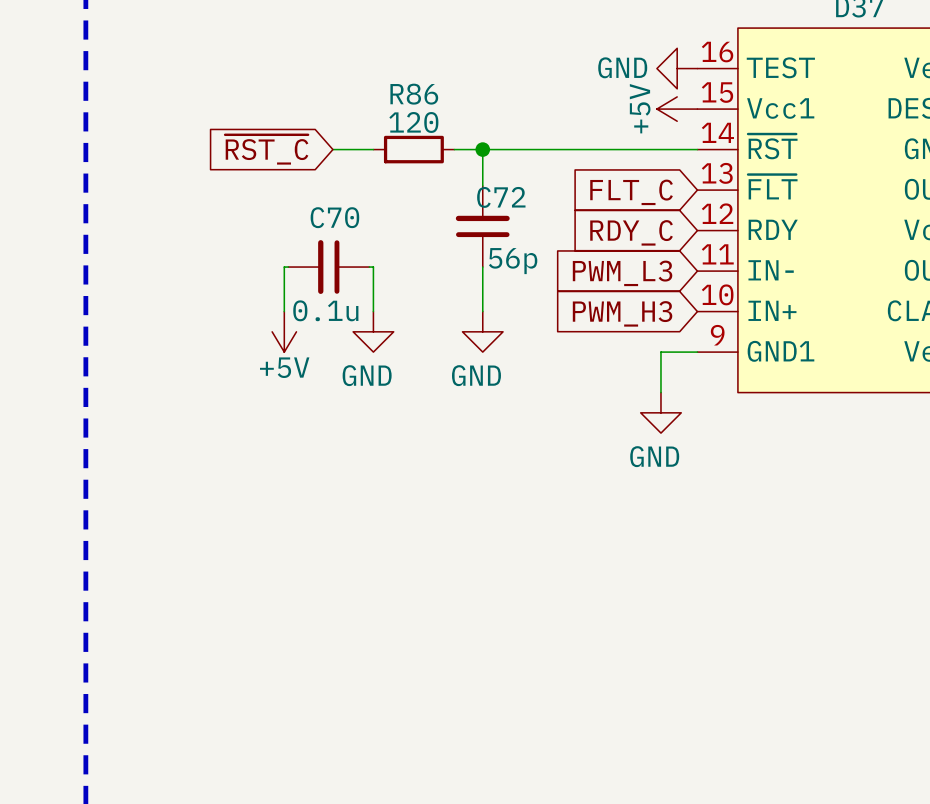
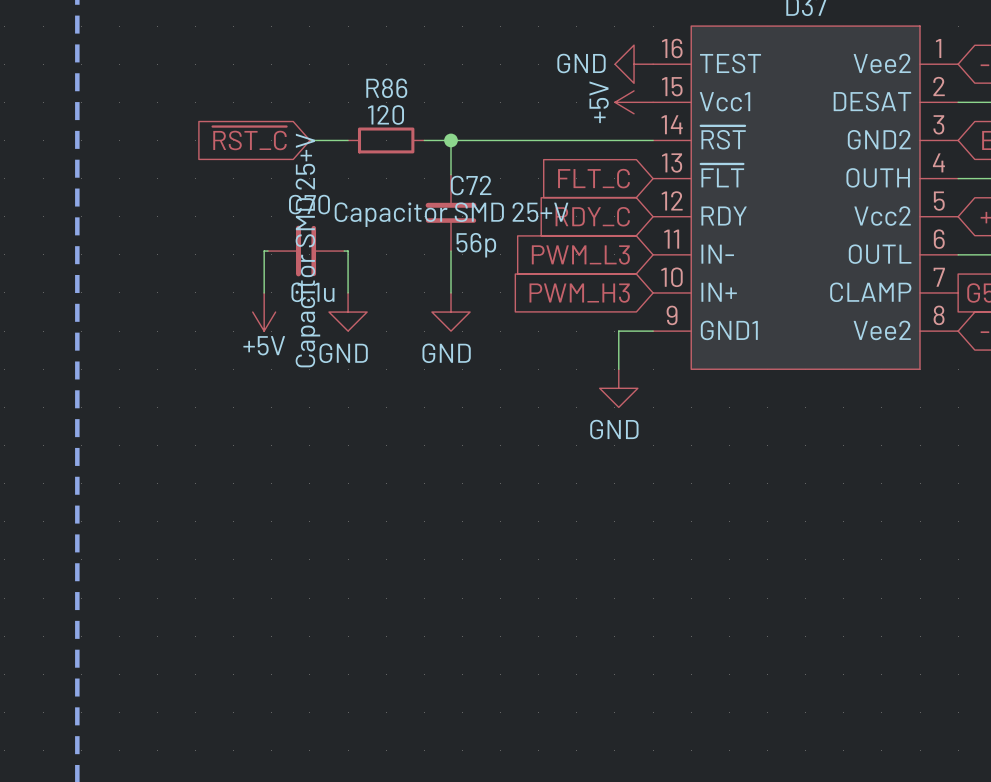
C72 text: none -> Capacitor SMD 25+V (451, 214)
C70 text: none -> Capacitor SMD 25+V (307, 250)

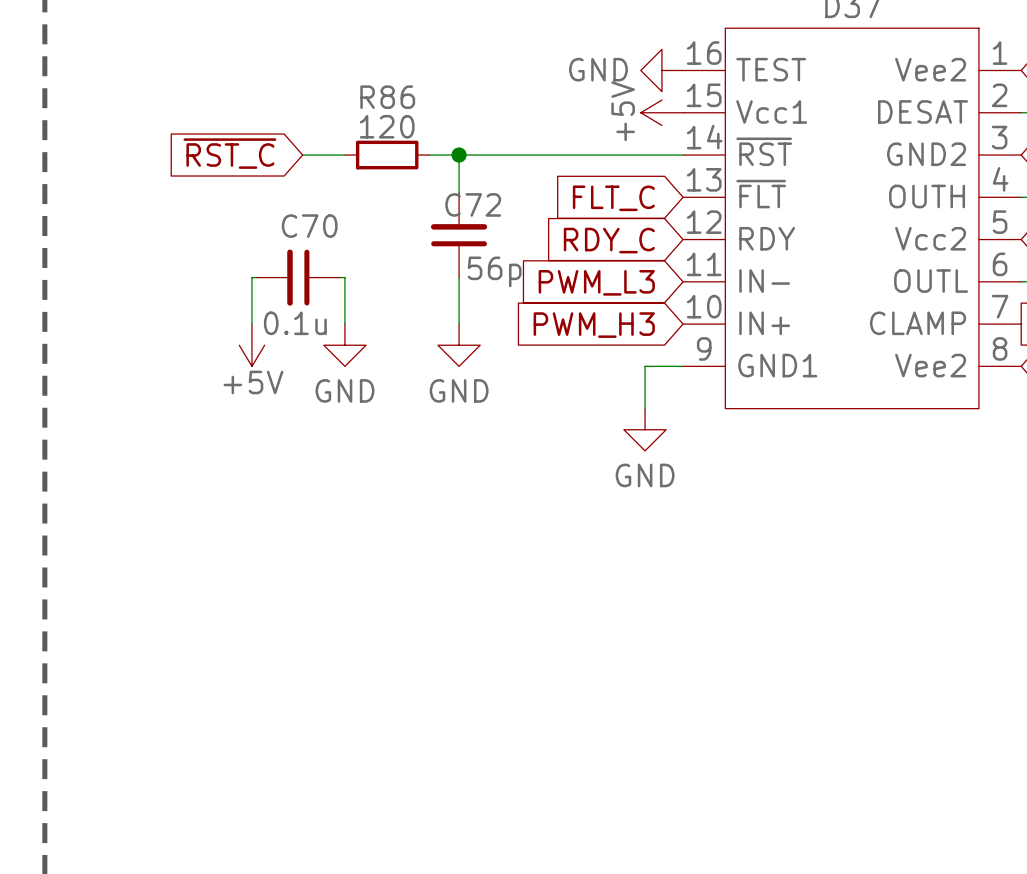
C72 text: Capacitor SMD 25+V (451, 214) -> none
C70 text: Capacitor SMD 25+V (307, 250) -> none

